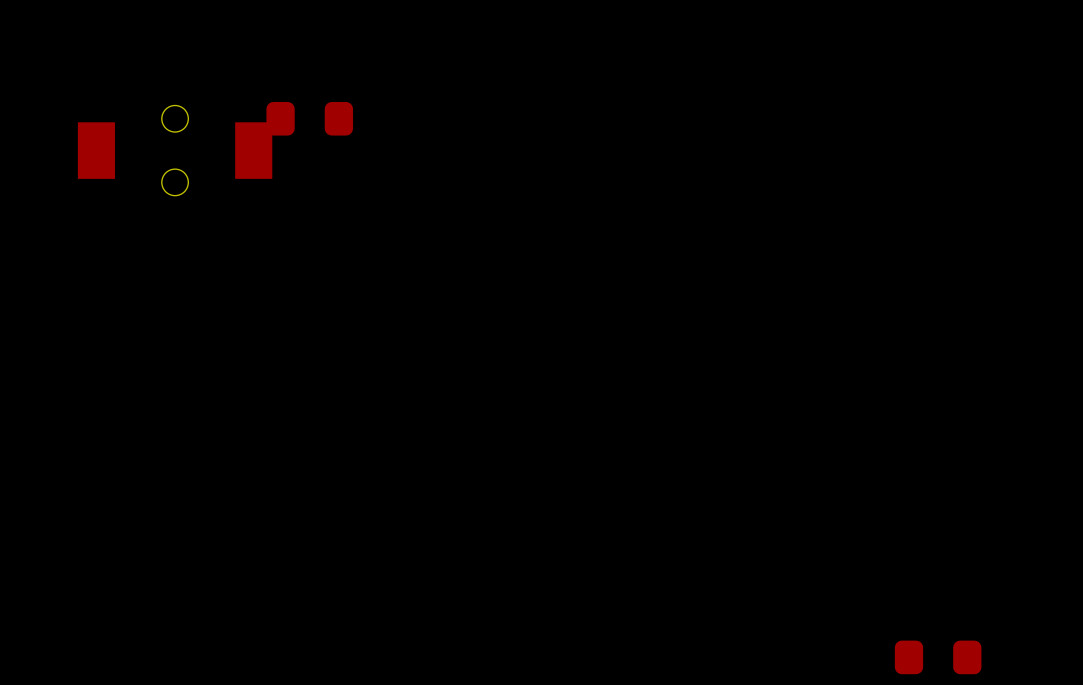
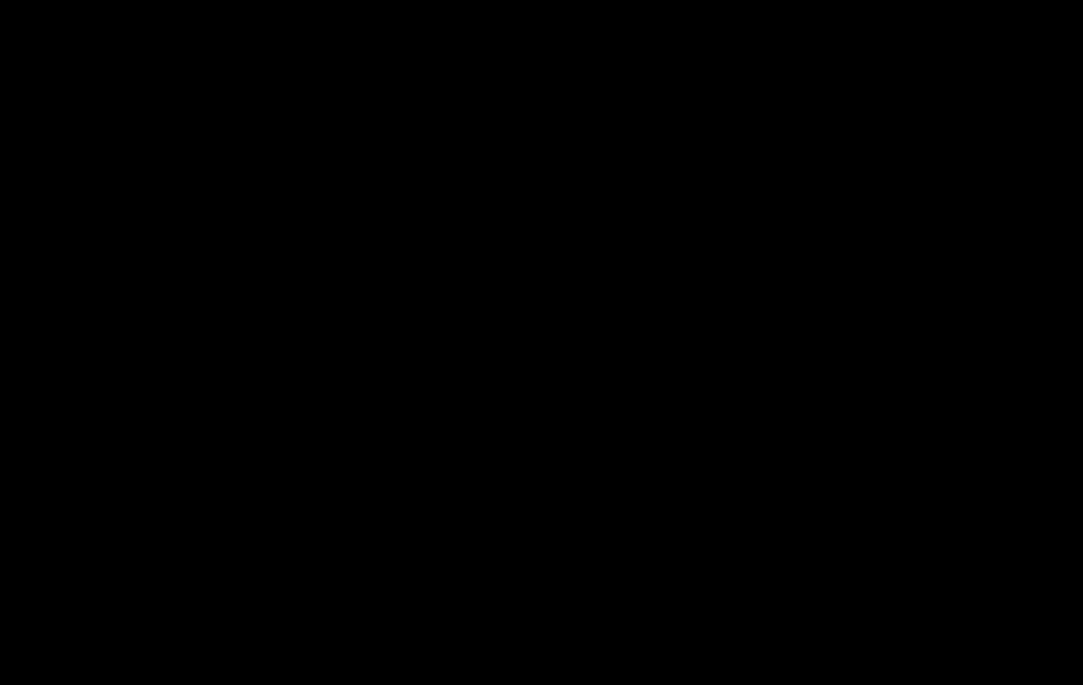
part: (309, 118) -> none
part: (175, 150) -> none
part: (938, 657) -> none

